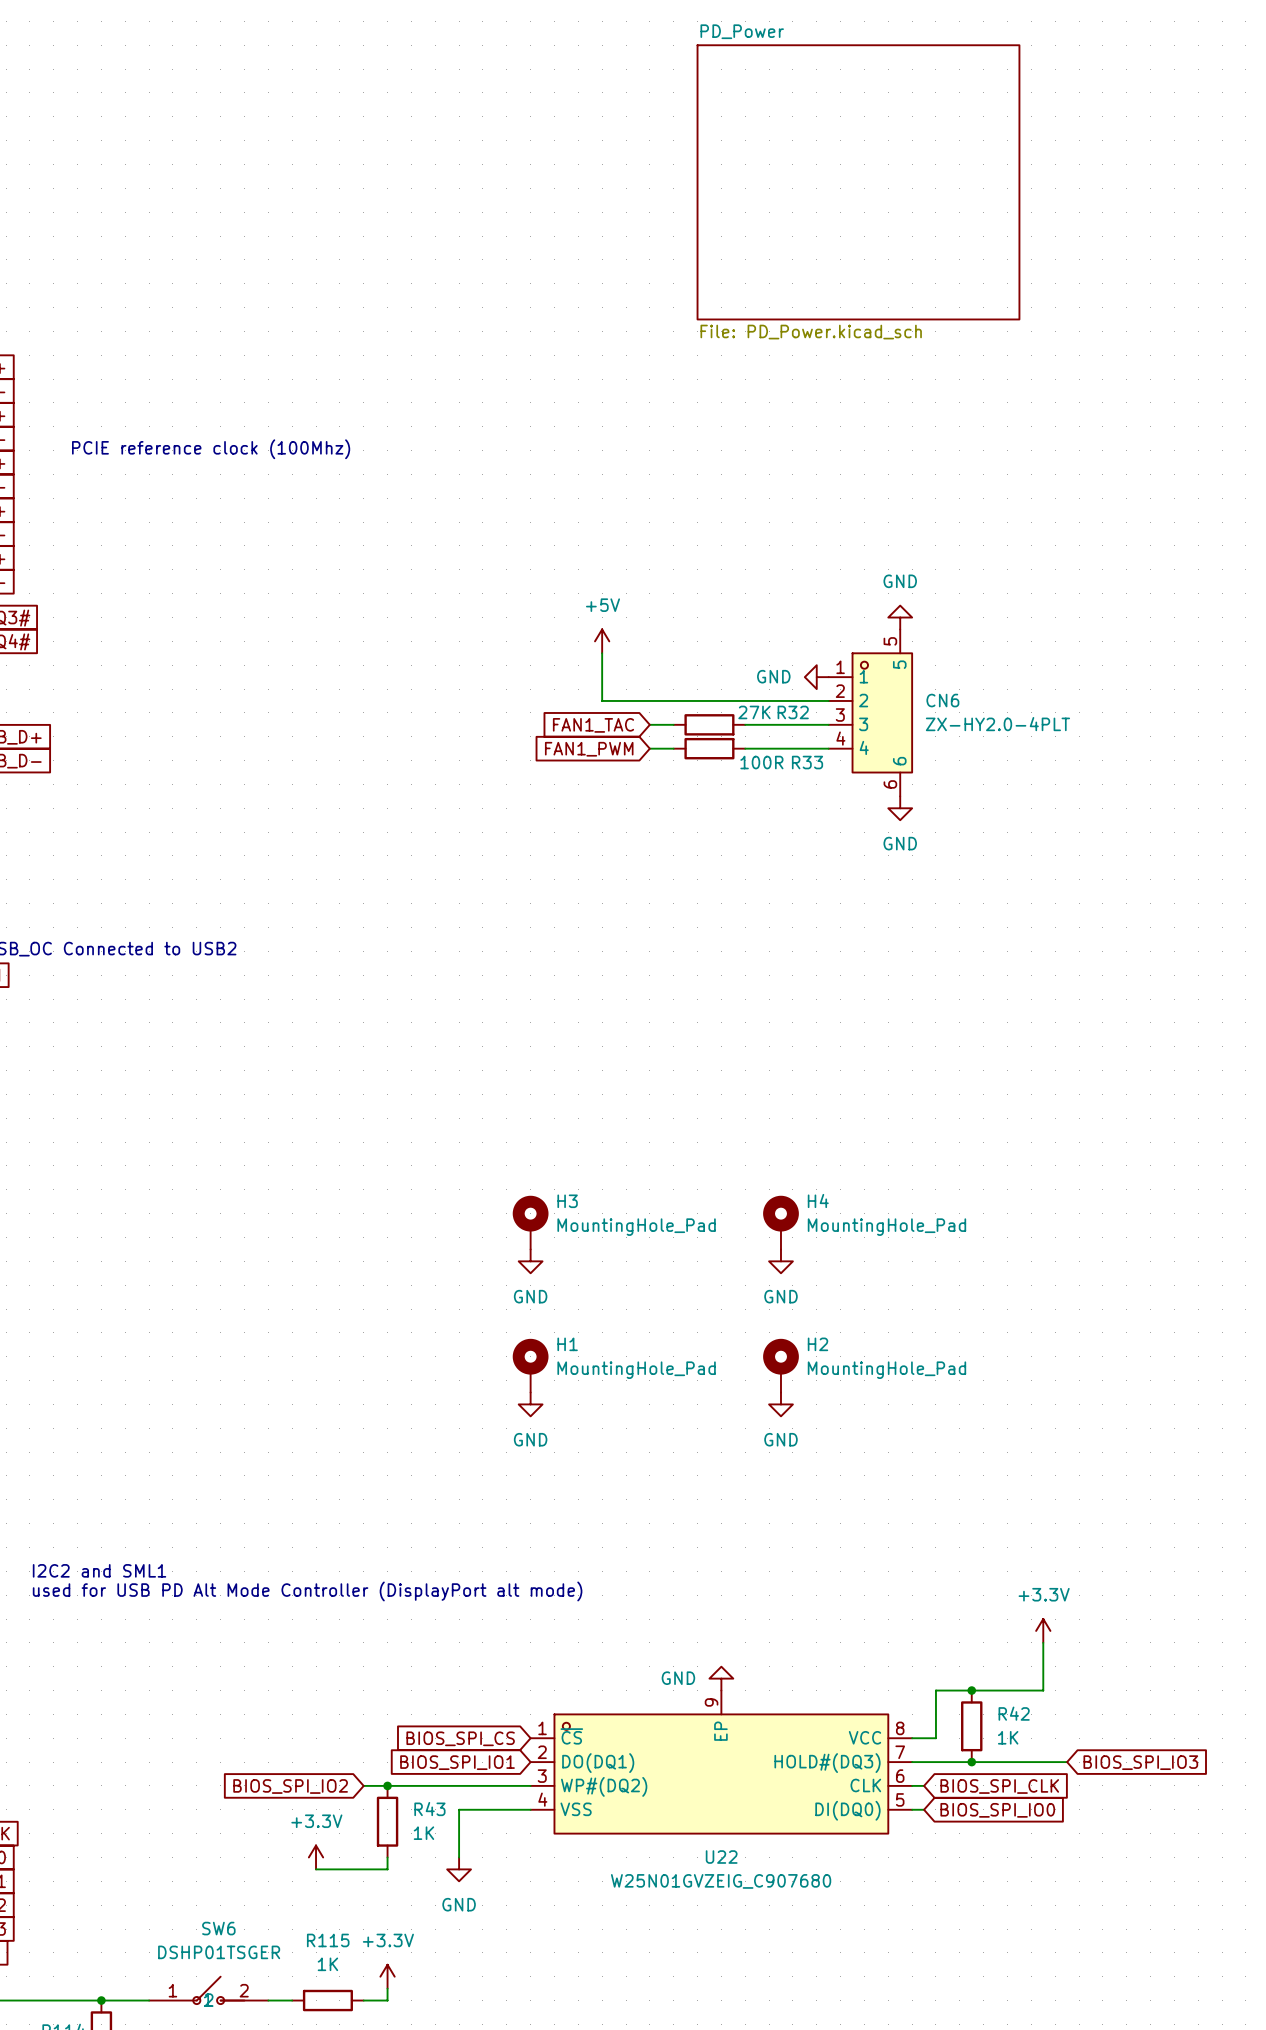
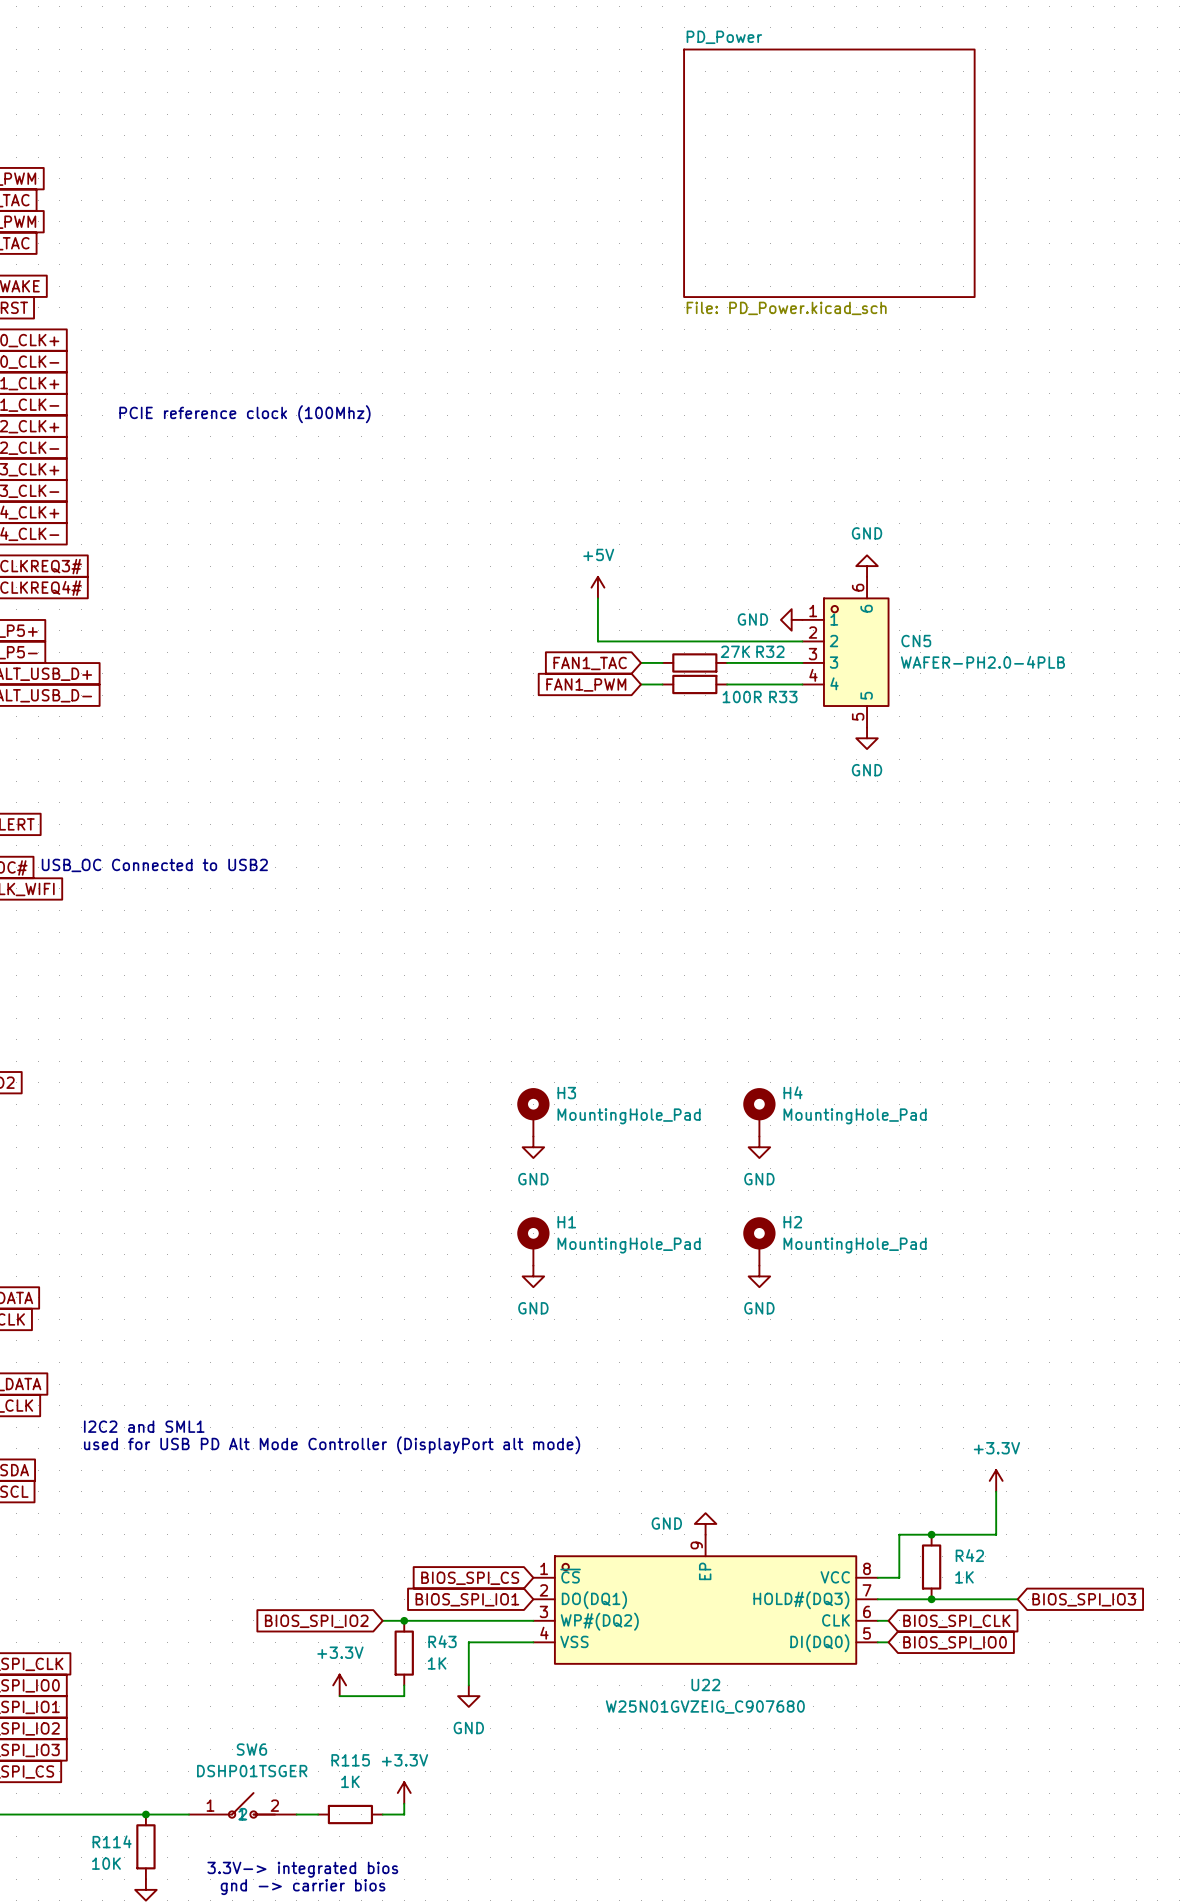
CN6: ZX-HY2.0-4PLT (870, 712) -> none
CN5: none -> WAFER-PH2.0-4PLB (845, 652)

